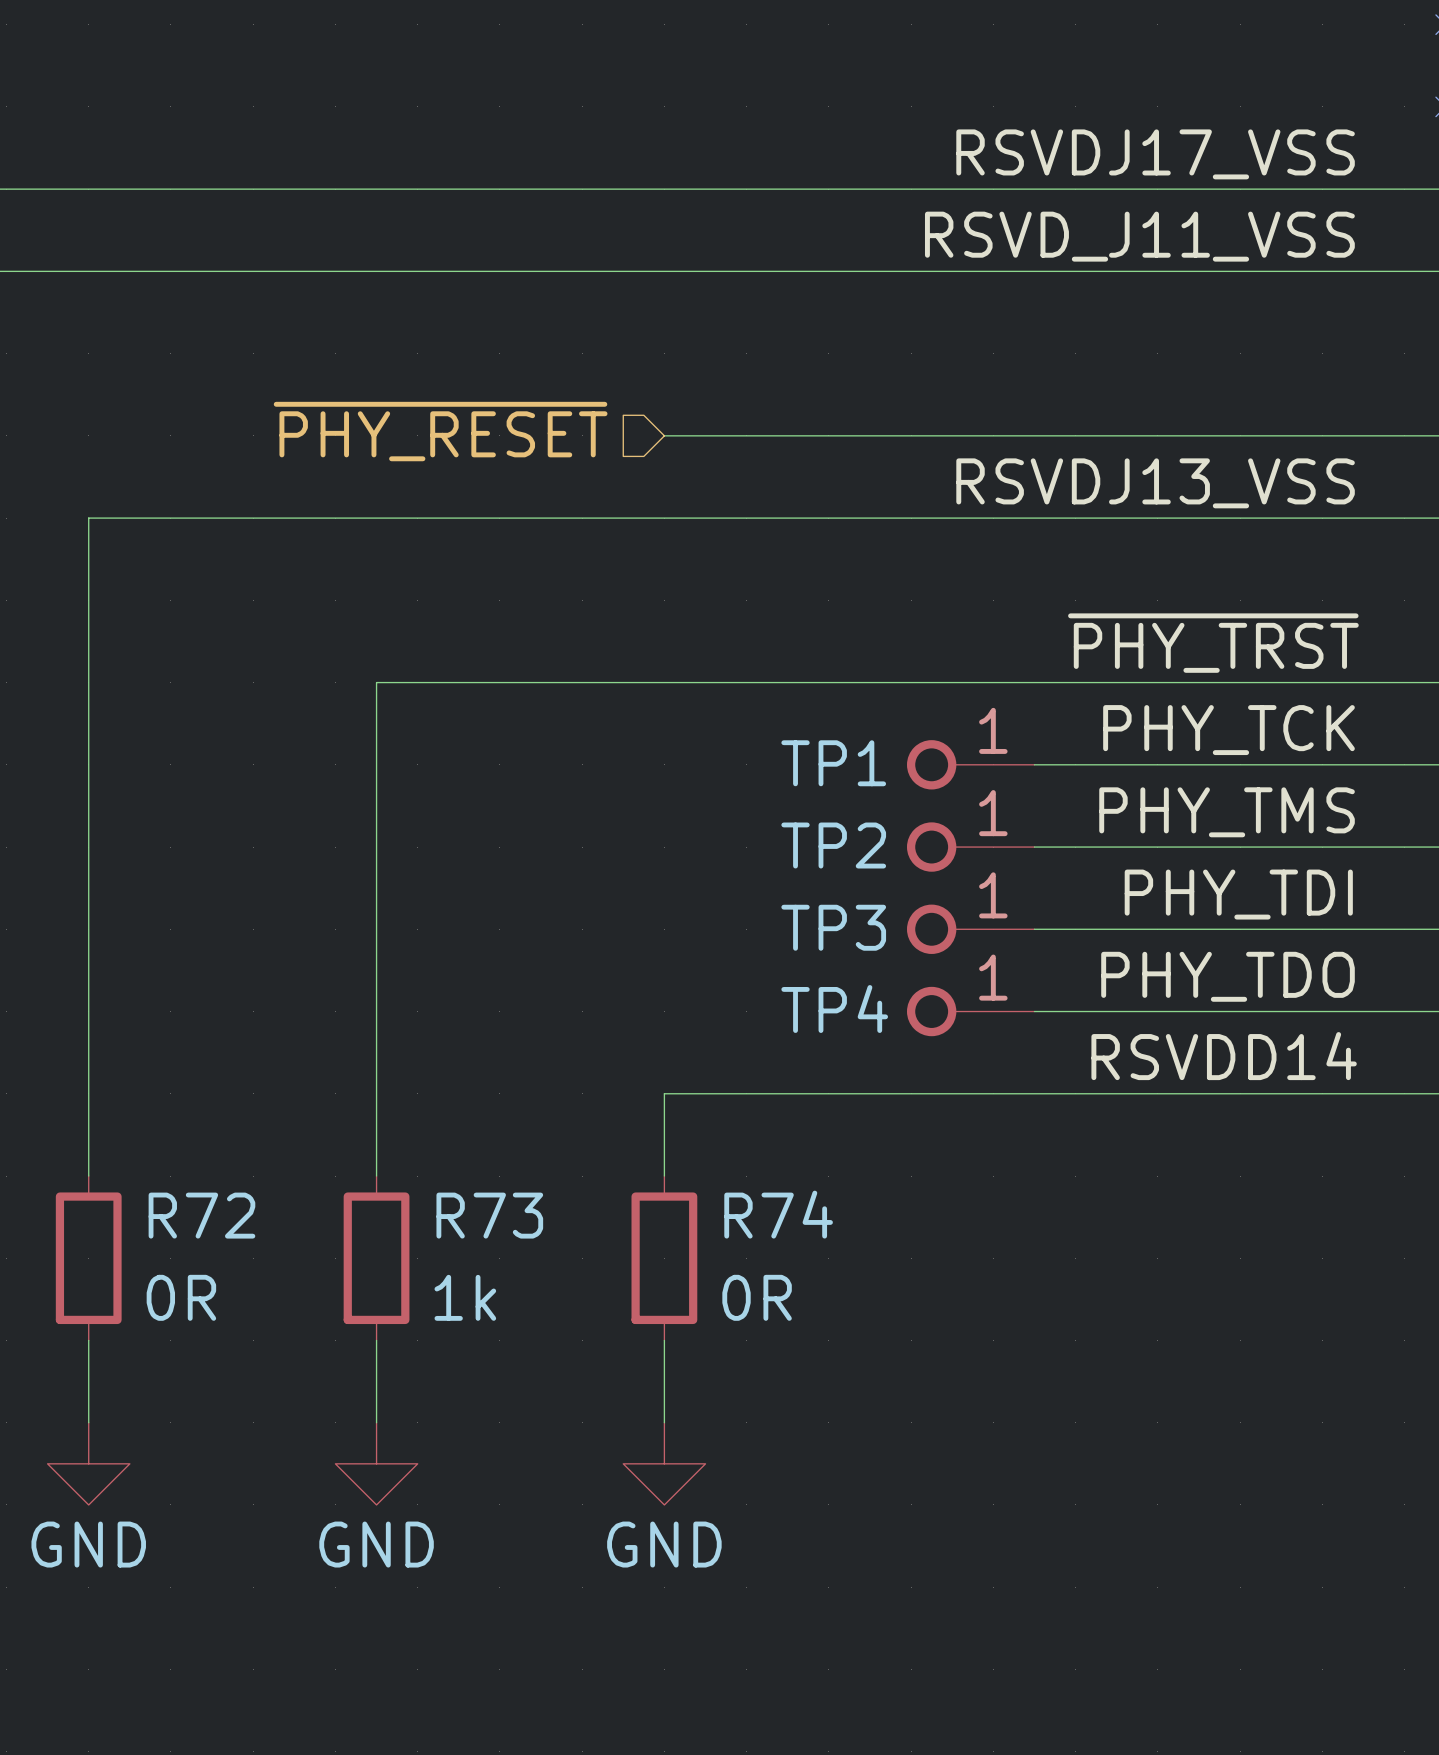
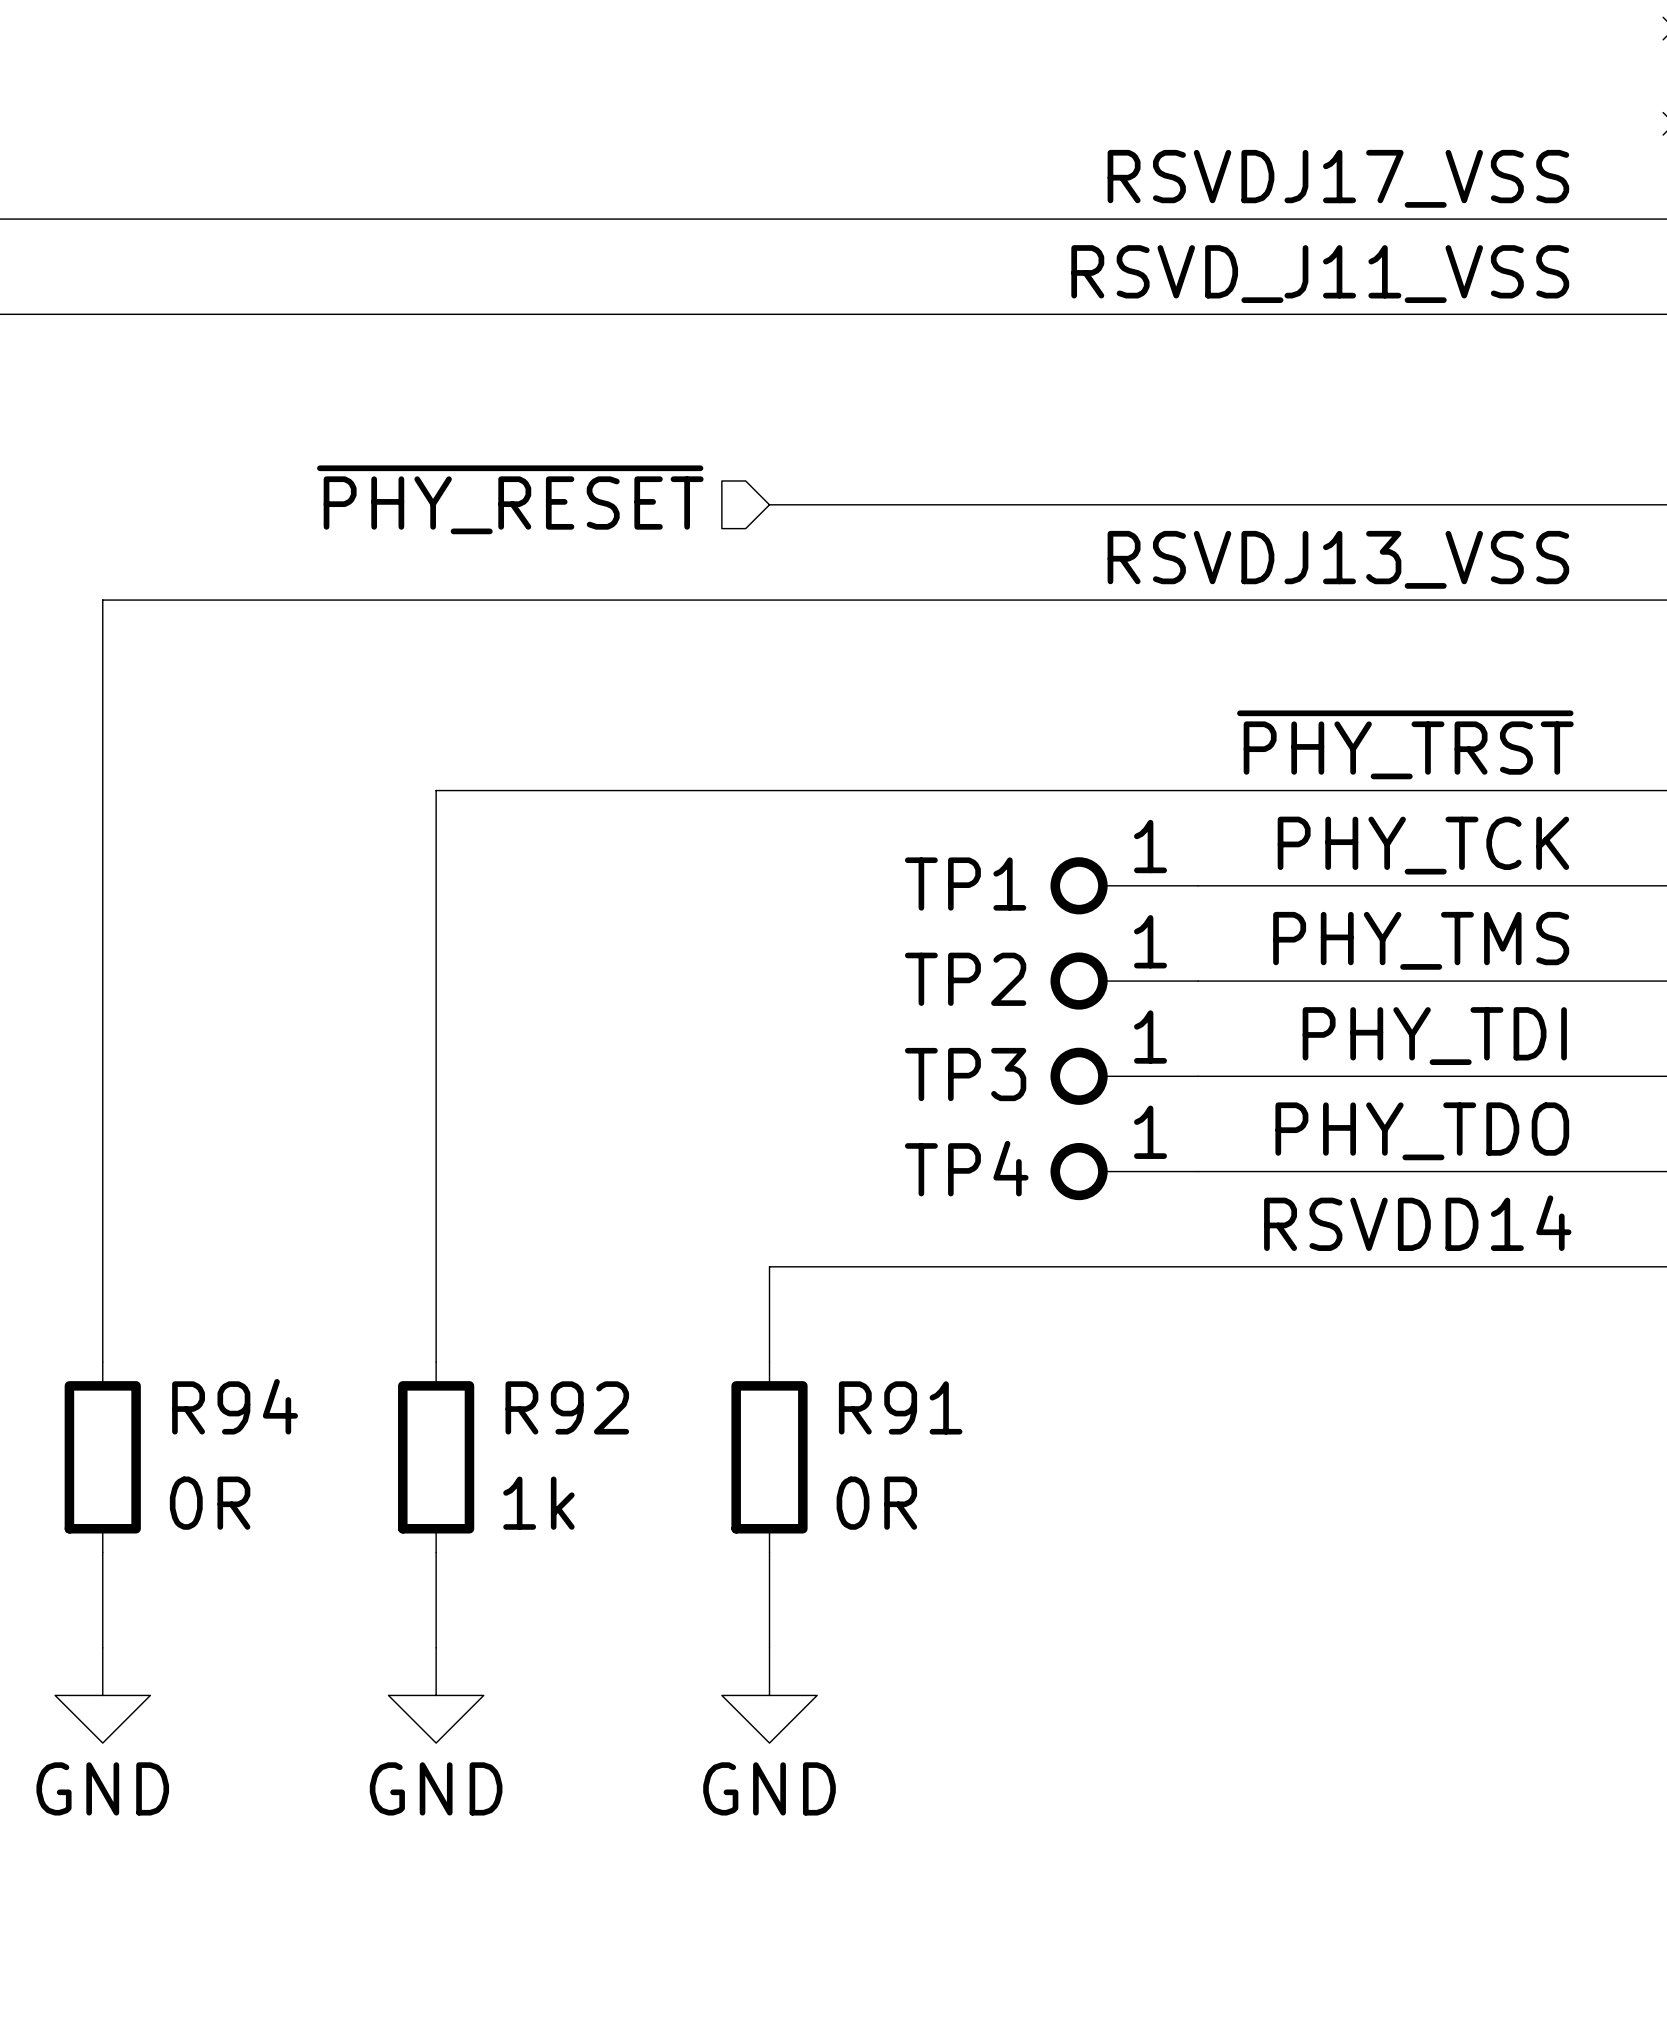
R74 name: R74 (778, 1214) -> R91 (900, 1407)
R72 name: R72 (201, 1215) -> R94 (235, 1406)
R73 name: R73 (489, 1215) -> R92 (567, 1407)

